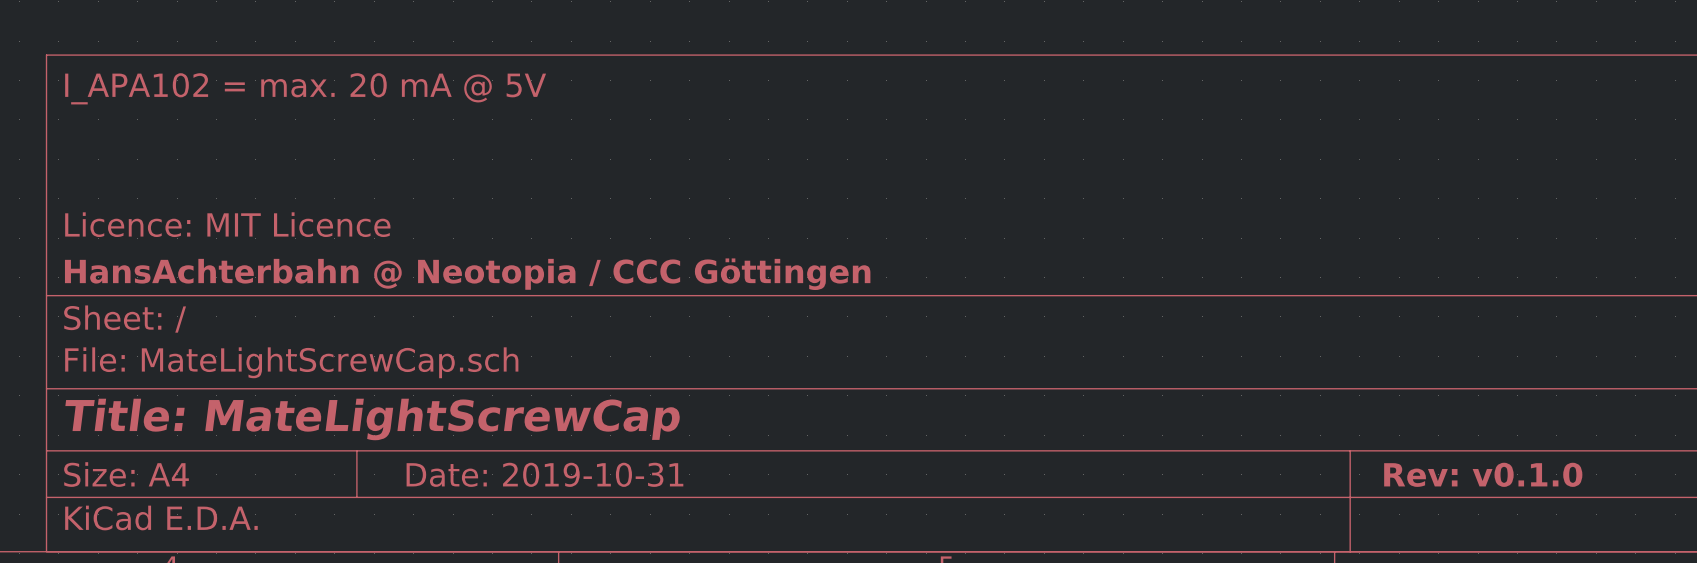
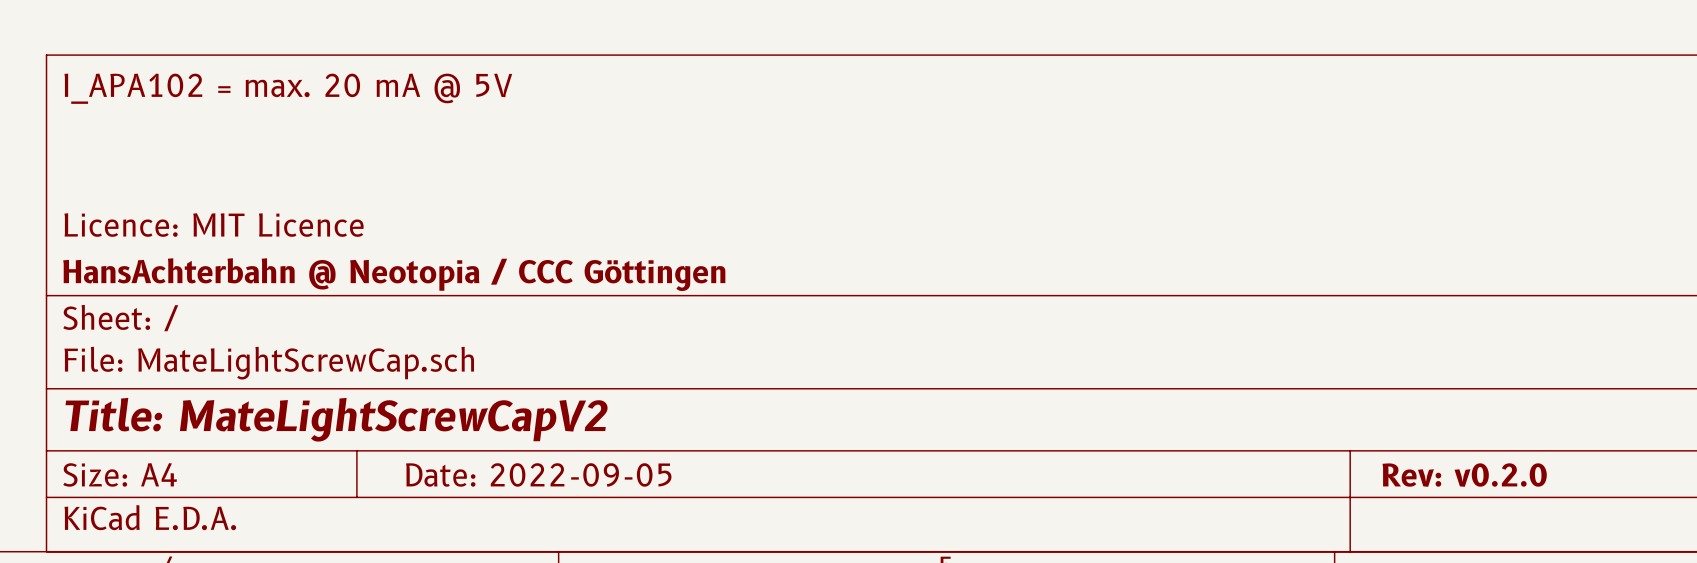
title block: Title: MateLightScrewCap (372, 419) -> Title: MateLightScrewCapV2 (336, 419)
title block: Date: 2019-10-31 (544, 474) -> Date: 2022-09-05 (538, 474)
title block: Rev: v0.1.0 (1483, 474) -> Rev: v0.2.0 (1464, 475)

